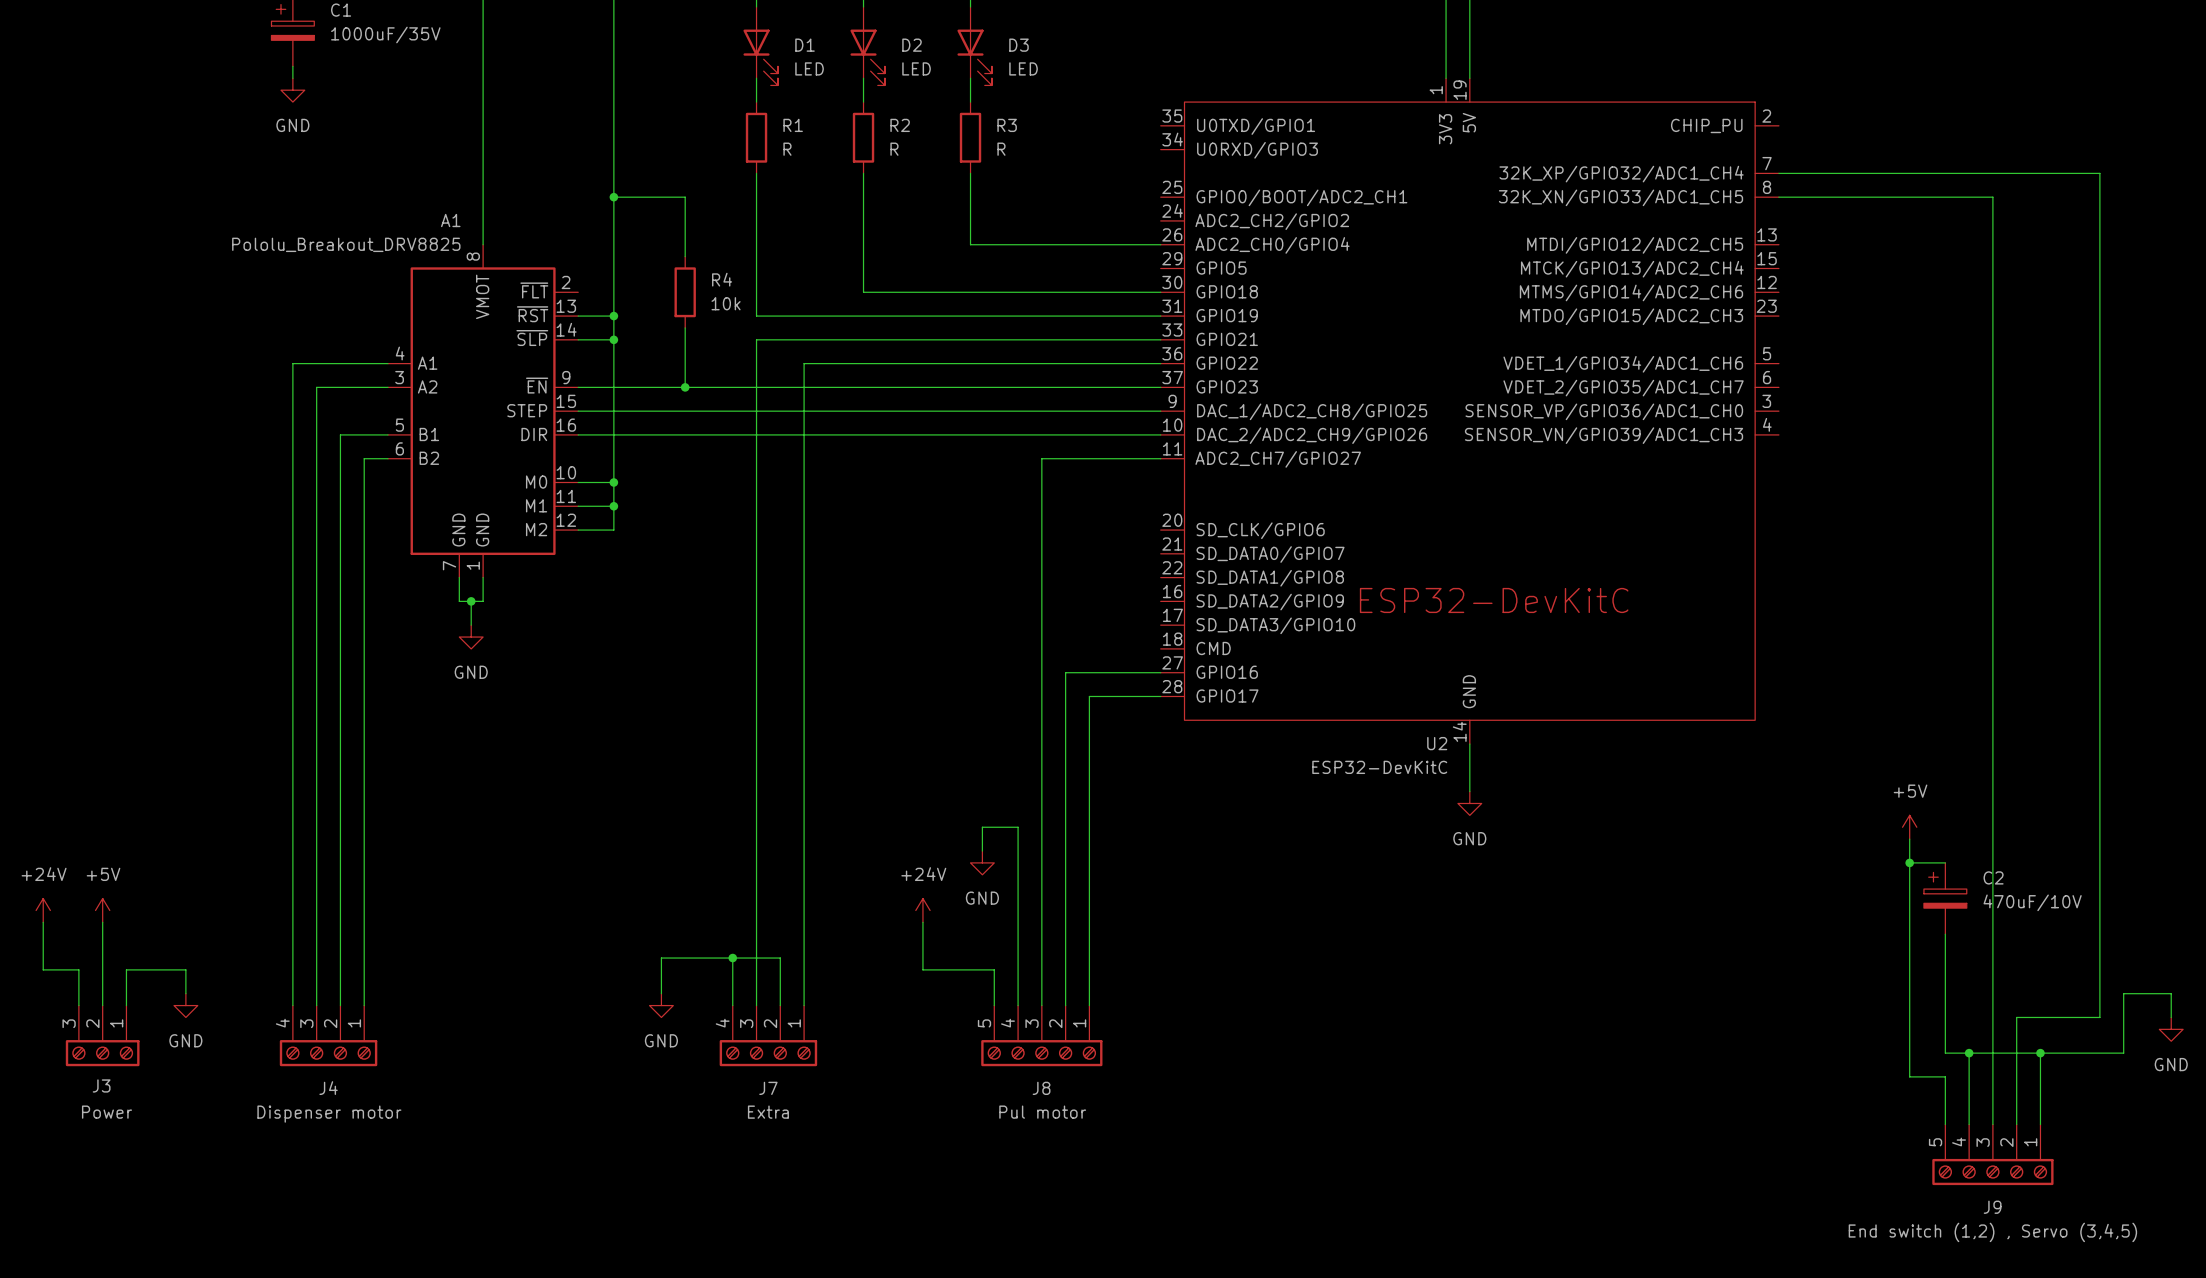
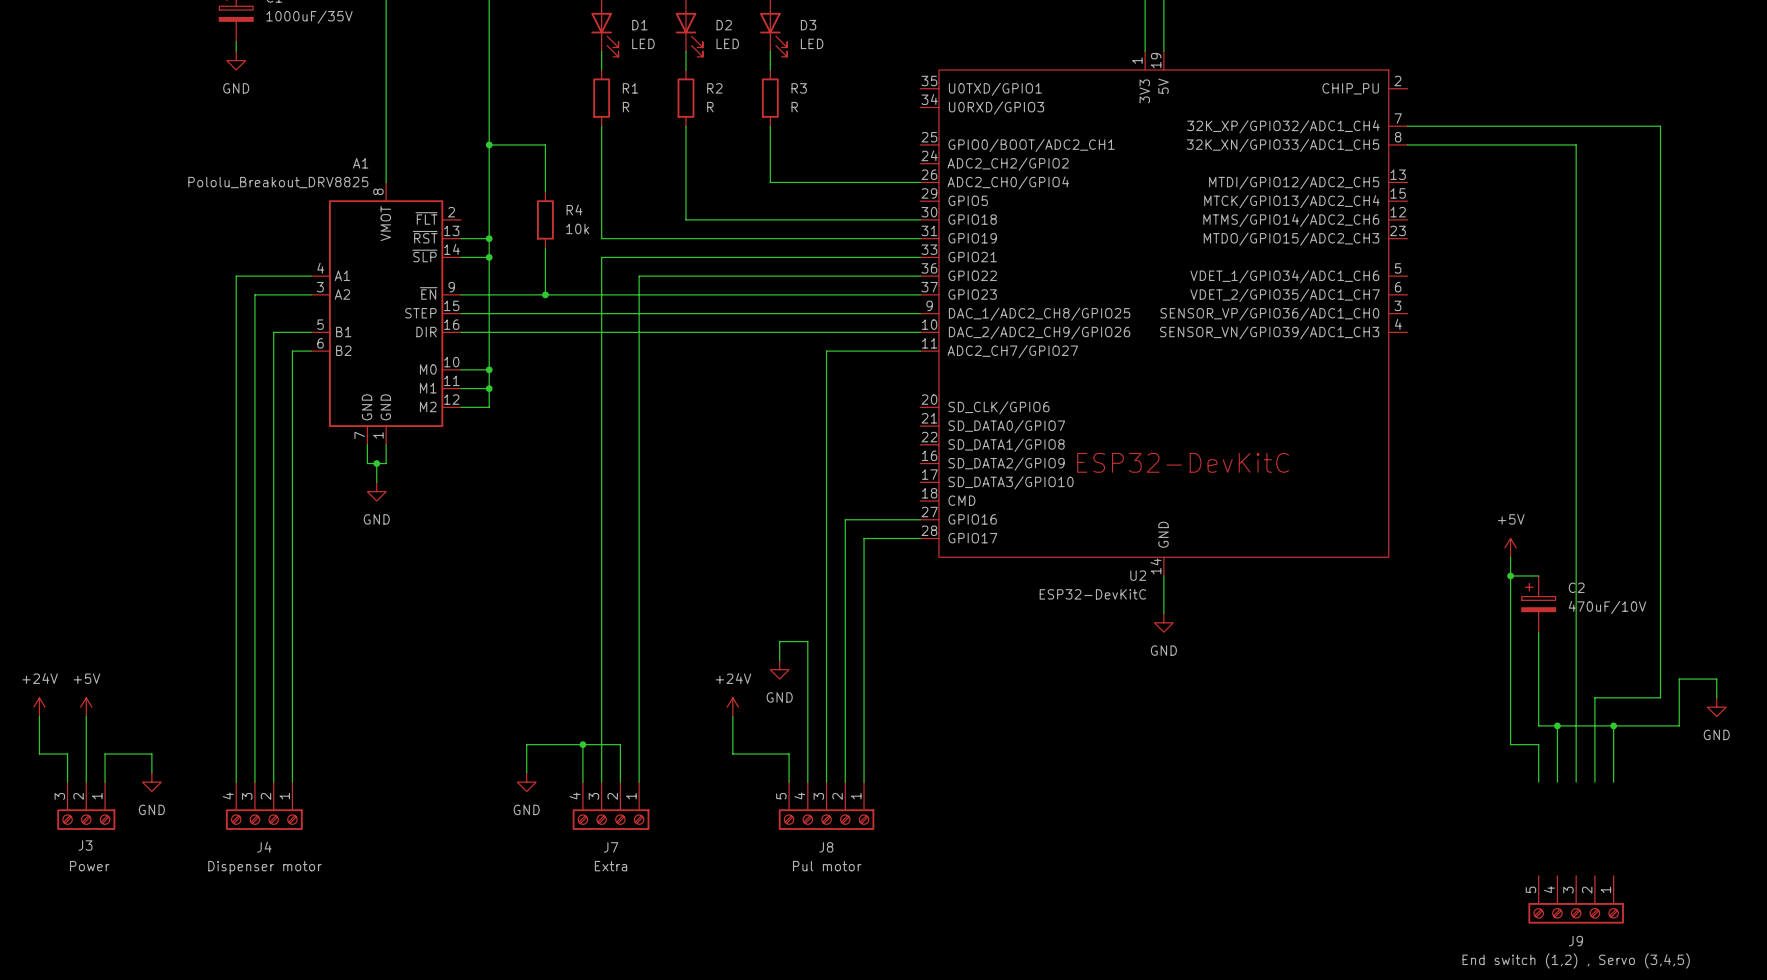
wire: none -> (1510, 557) (1510, 650)
junction: none -> (1510, 575)
wire: none -> (1538, 632) (1538, 725) (1679, 725) (1679, 679) (1716, 679) (1716, 697)
power symbol position: +5V (1909, 827) -> +5V (1510, 547)
wire: (1909, 862) (1945, 862) -> (1510, 575) (1538, 575)
junction: (1909, 862) -> none
C2 position: (1945, 898) -> (1538, 604)
wire: (2099, 898) (2099, 1017) (2016, 1017) (2016, 1124) -> (1660, 697) (1594, 697) (1594, 782)
wire: (1945, 934) (1945, 958) -> (1510, 744) (1538, 744)
junction: none -> (1557, 725)
junction: none -> (1613, 725)
wire: (1909, 958) (1909, 1076) (1945, 1076) (1945, 1124) -> none
wire: (1945, 1005) (1945, 1053) (2123, 1053) (2123, 993) (2171, 993) (2171, 1017) -> none
wire: (1992, 1005) (1992, 1124) -> none
power symbol position: GND (2171, 1029) -> GND (1716, 707)
wire: (1969, 1053) (1969, 1124) -> (1557, 725) (1557, 782)
junction: (1969, 1053) -> none
wire: (2040, 1053) (2040, 1124) -> (1613, 725) (1613, 782)
junction: (2040, 1053) -> none

